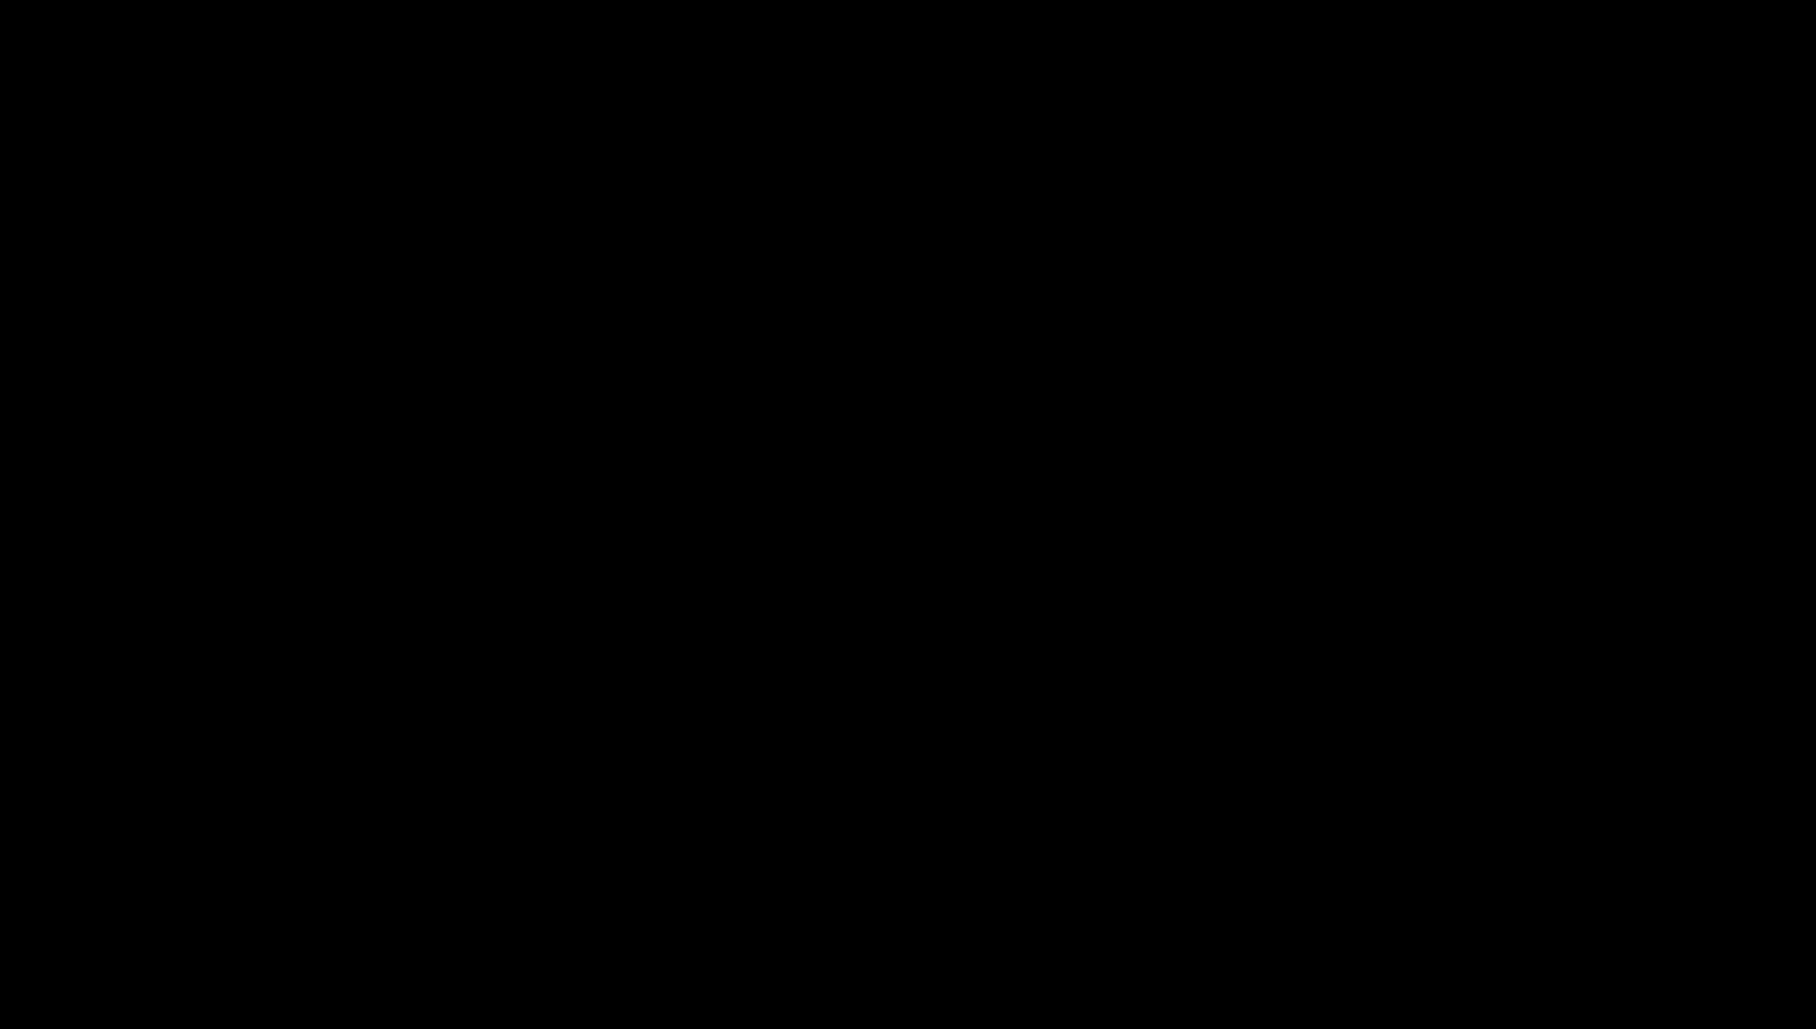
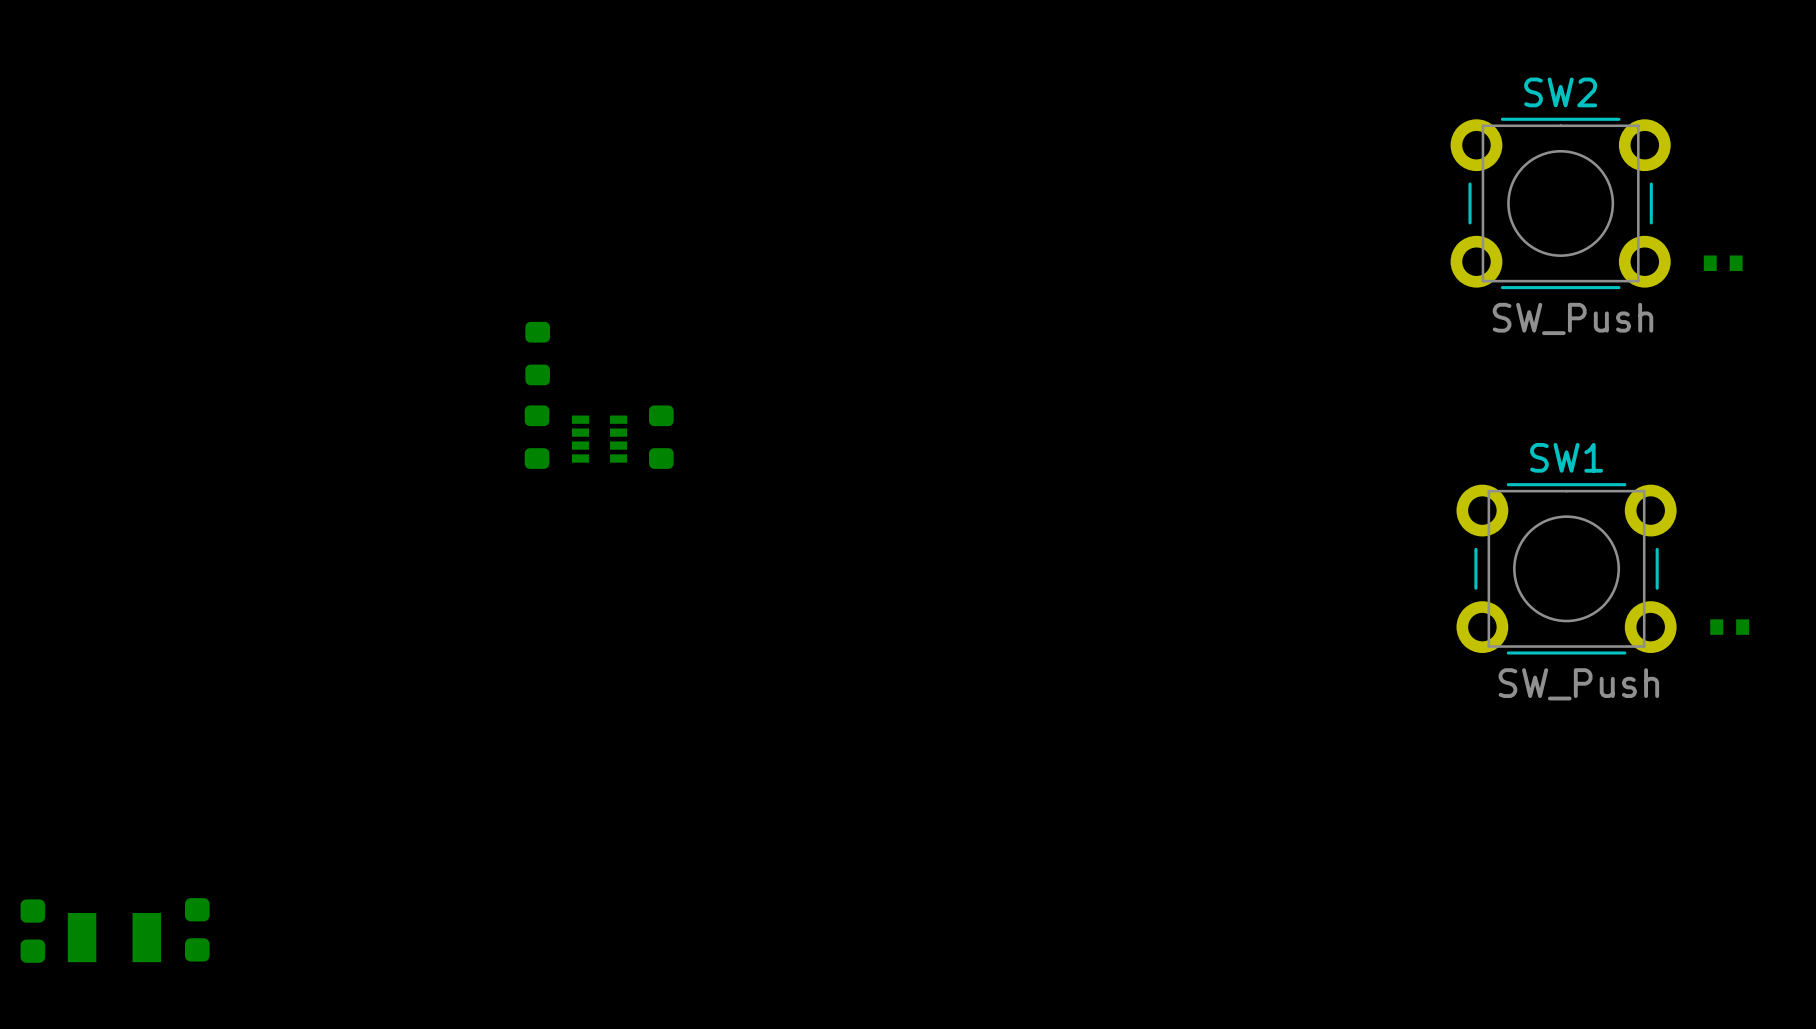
SW2: none -> SW_Push (1560, 203)
part: none -> (1723, 263)
part: none -> (537, 353)
part: none -> (537, 437)
part: none -> (661, 437)
part: none -> (599, 439)
SW1: none -> SW_Push (1566, 568)
part: none -> (1729, 627)
part: none -> (197, 929)
part: none -> (32, 931)
part: none -> (114, 937)

